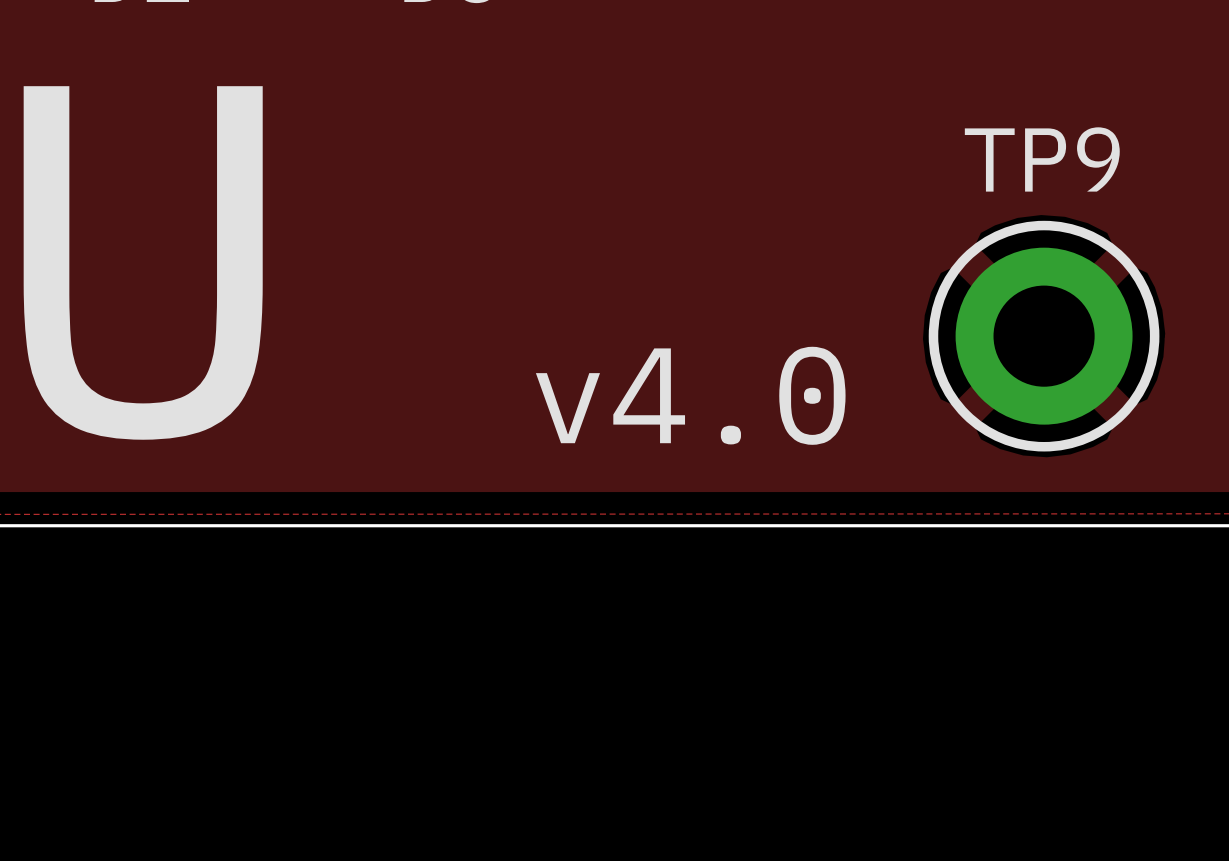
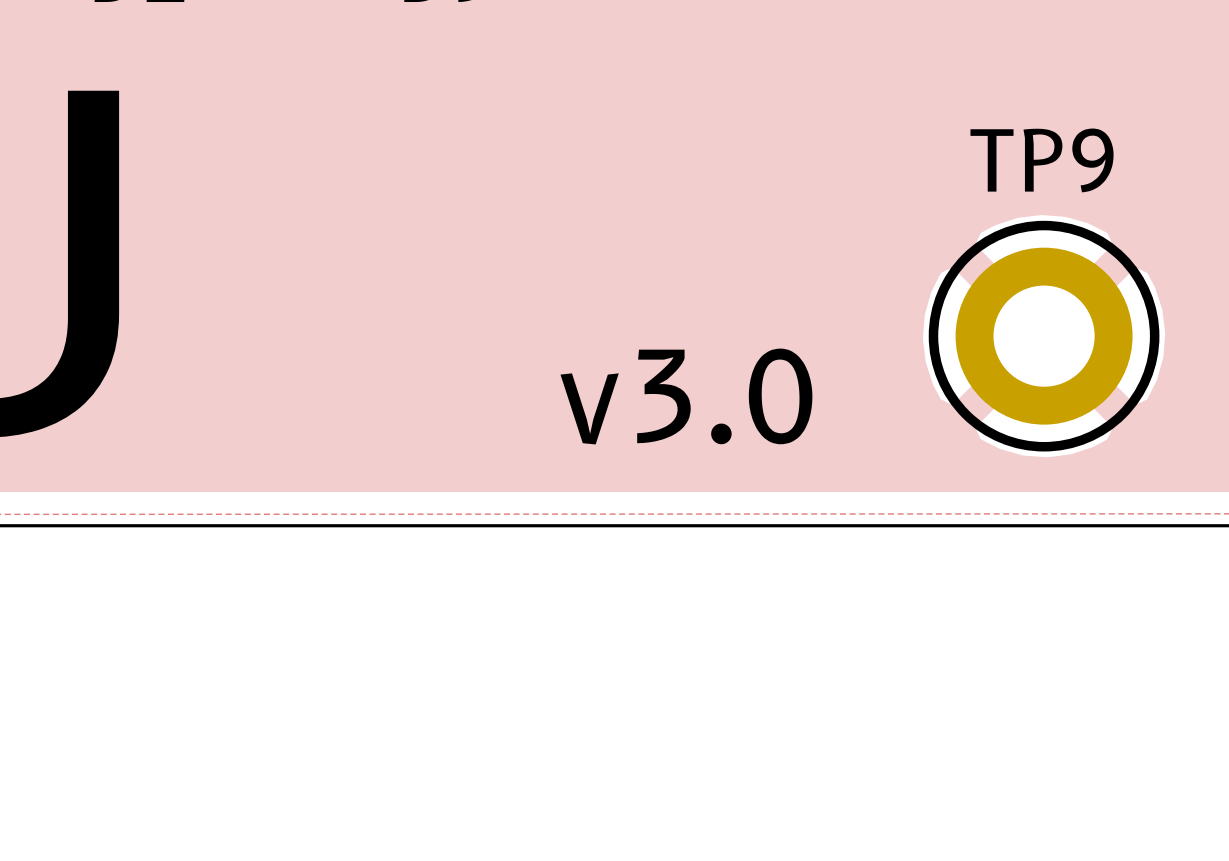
text: v4.0 (690, 395) -> v3.0 (686, 396)

